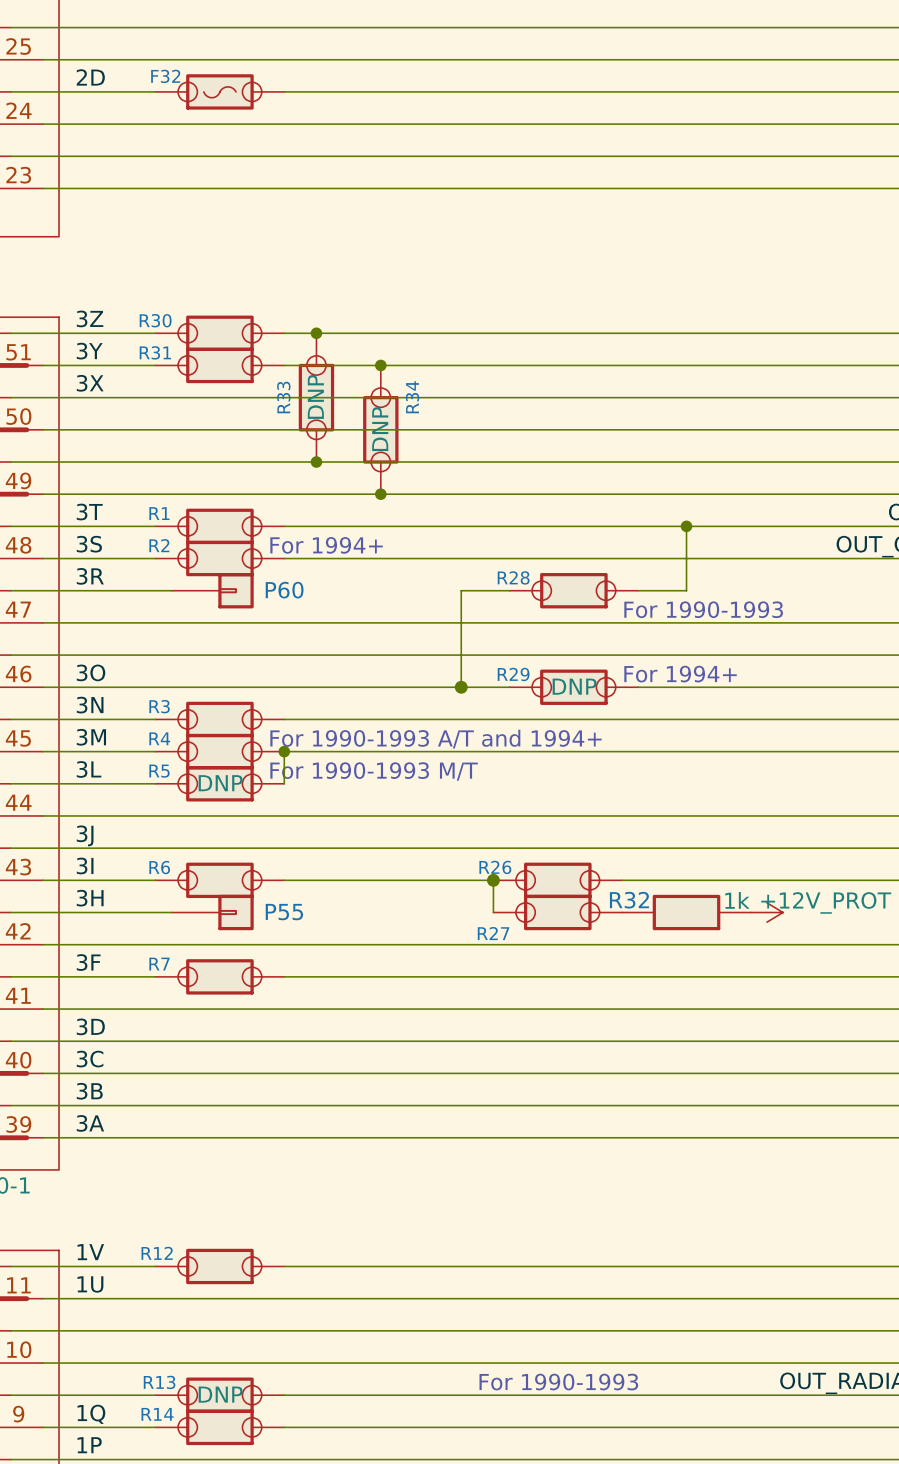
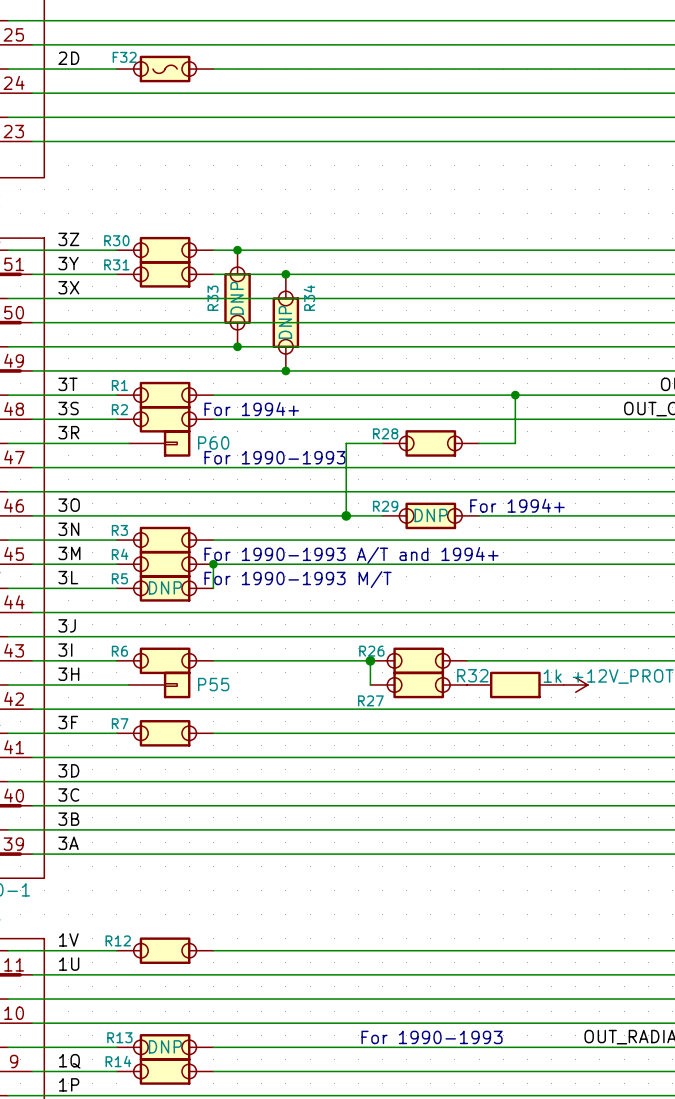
text: none -> For 1990-1993 (275, 457)
text: For 1990-1993 (703, 609) -> none

